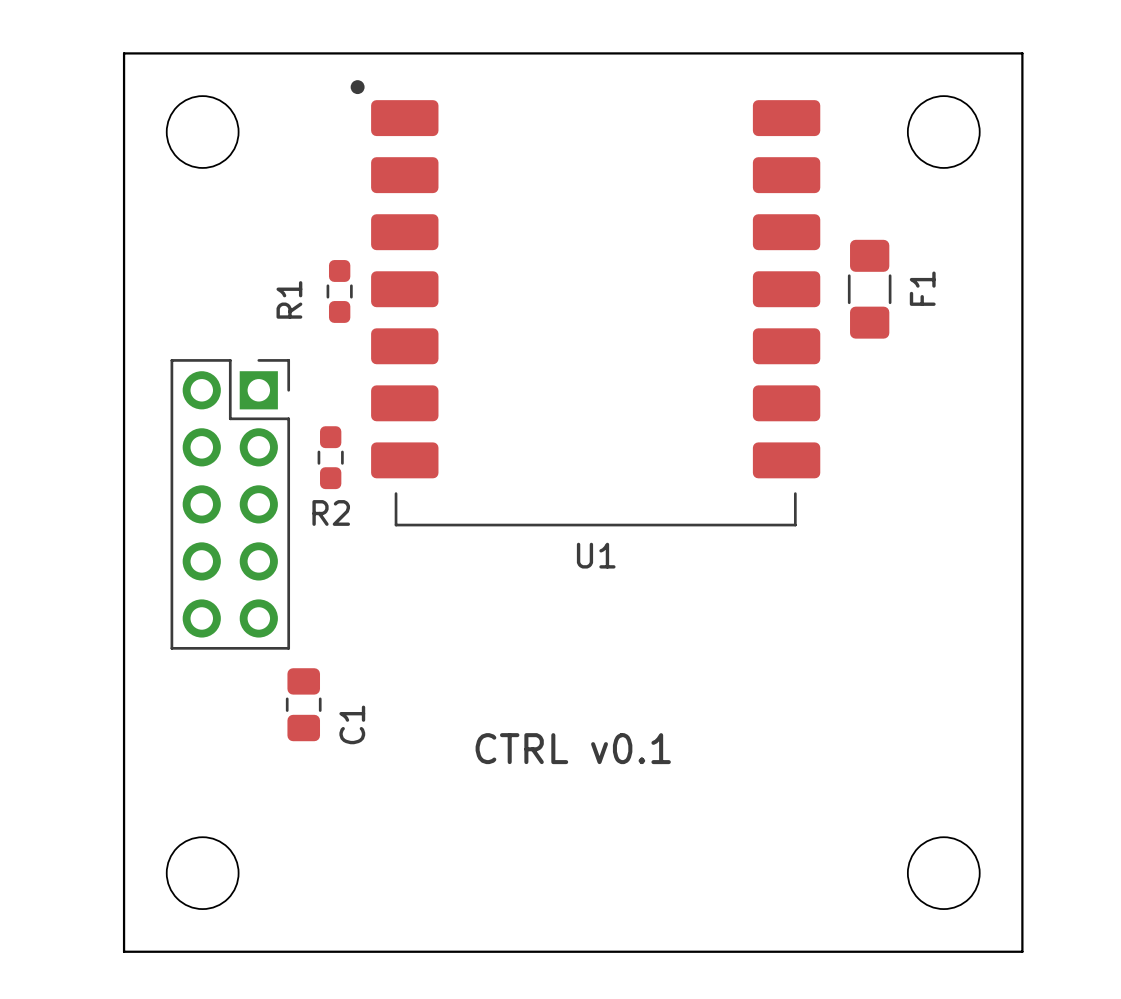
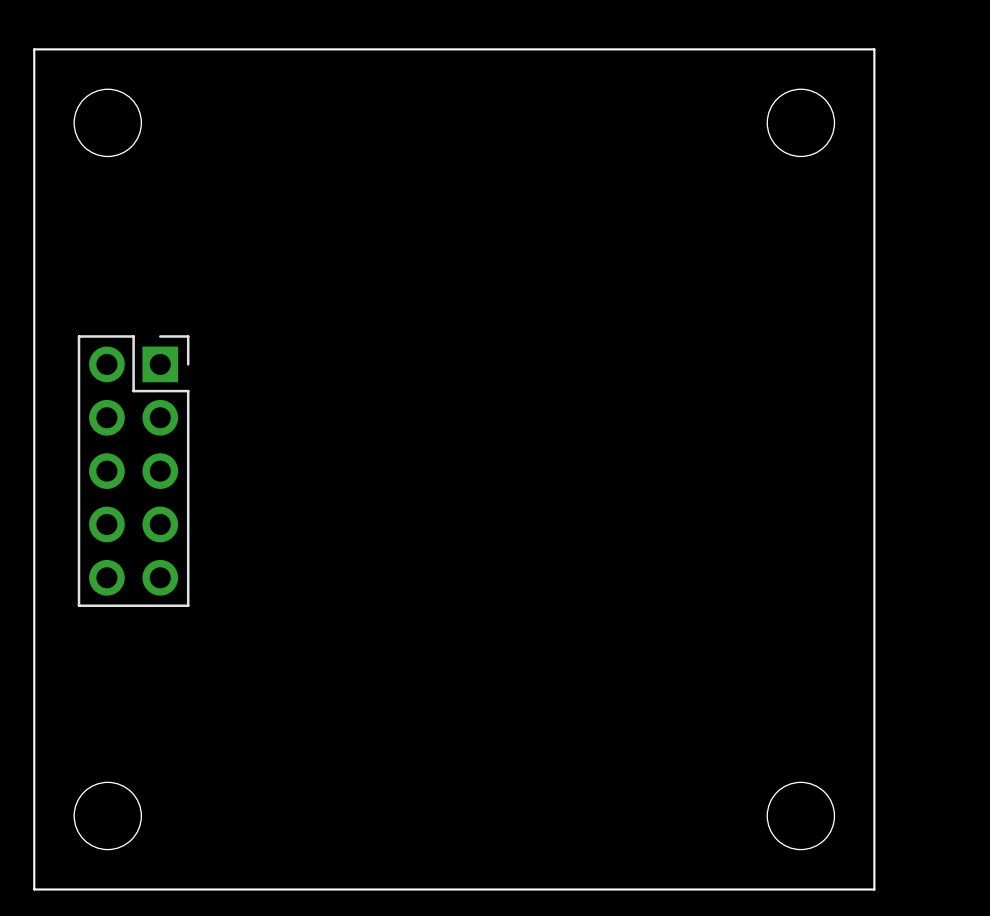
F1: (869, 289) -> none
R1: (339, 291) -> none
U1: (585, 303) -> none
R2: (330, 457) -> none
C1: (303, 704) -> none
text: CTRL v0.1 (573, 748) -> none

